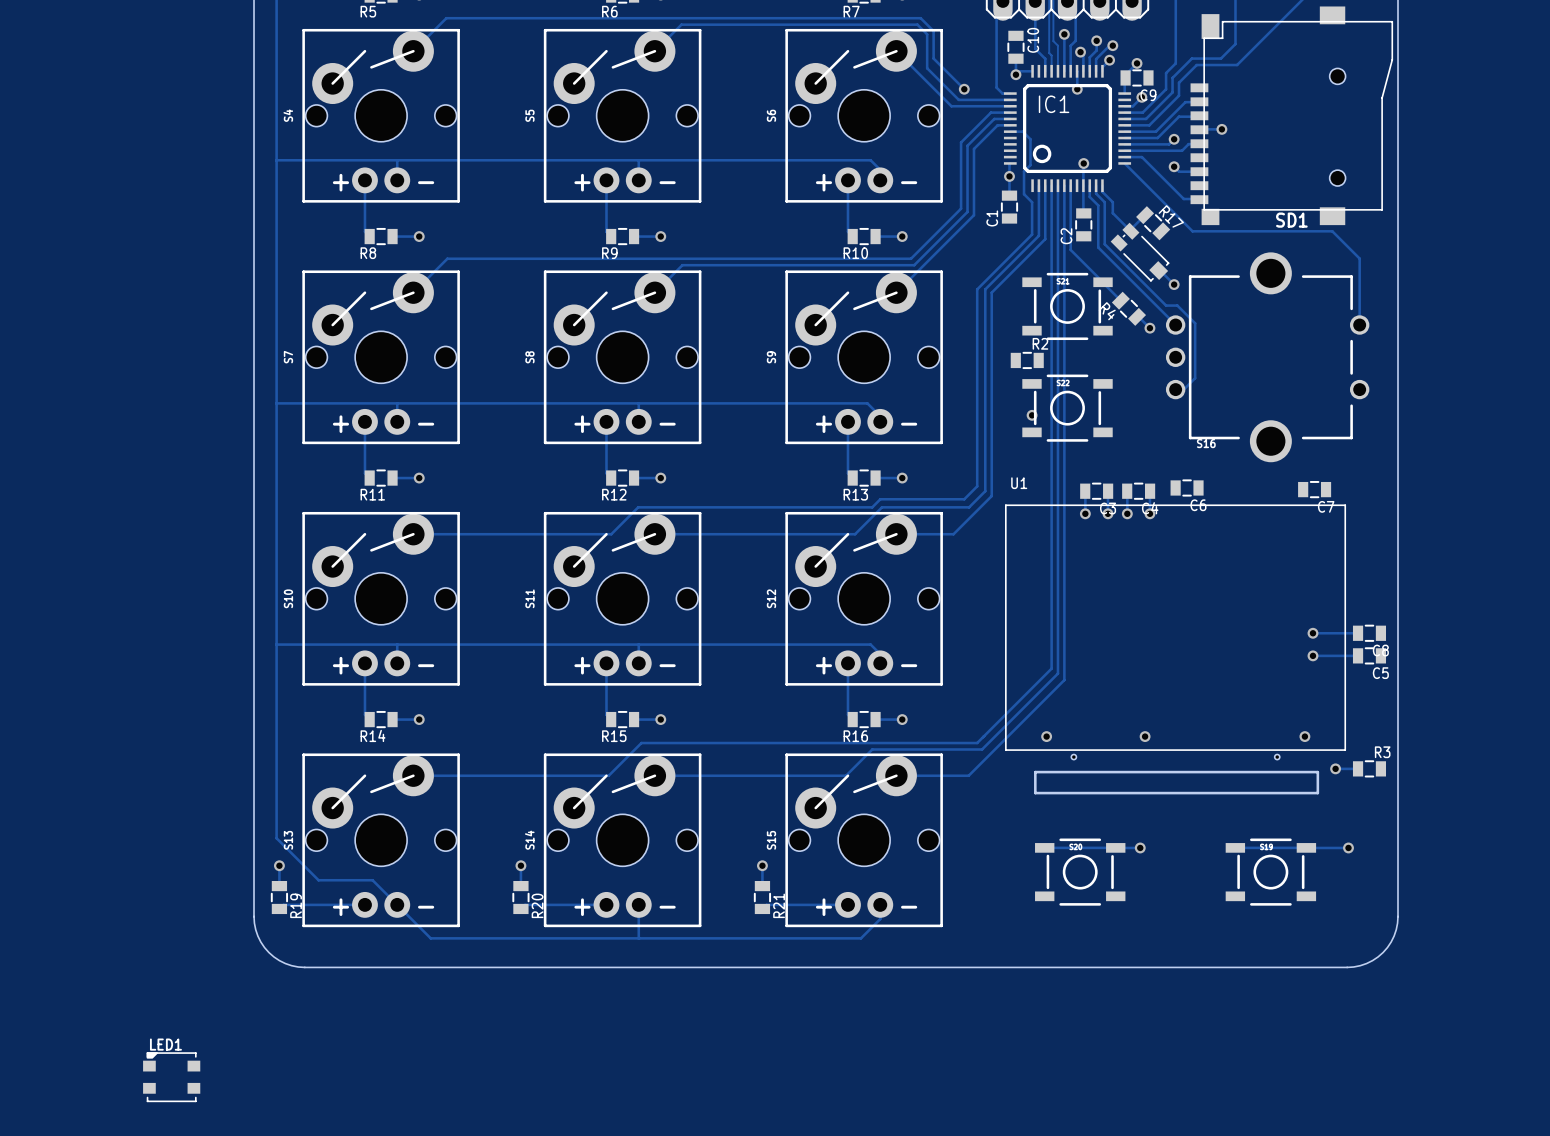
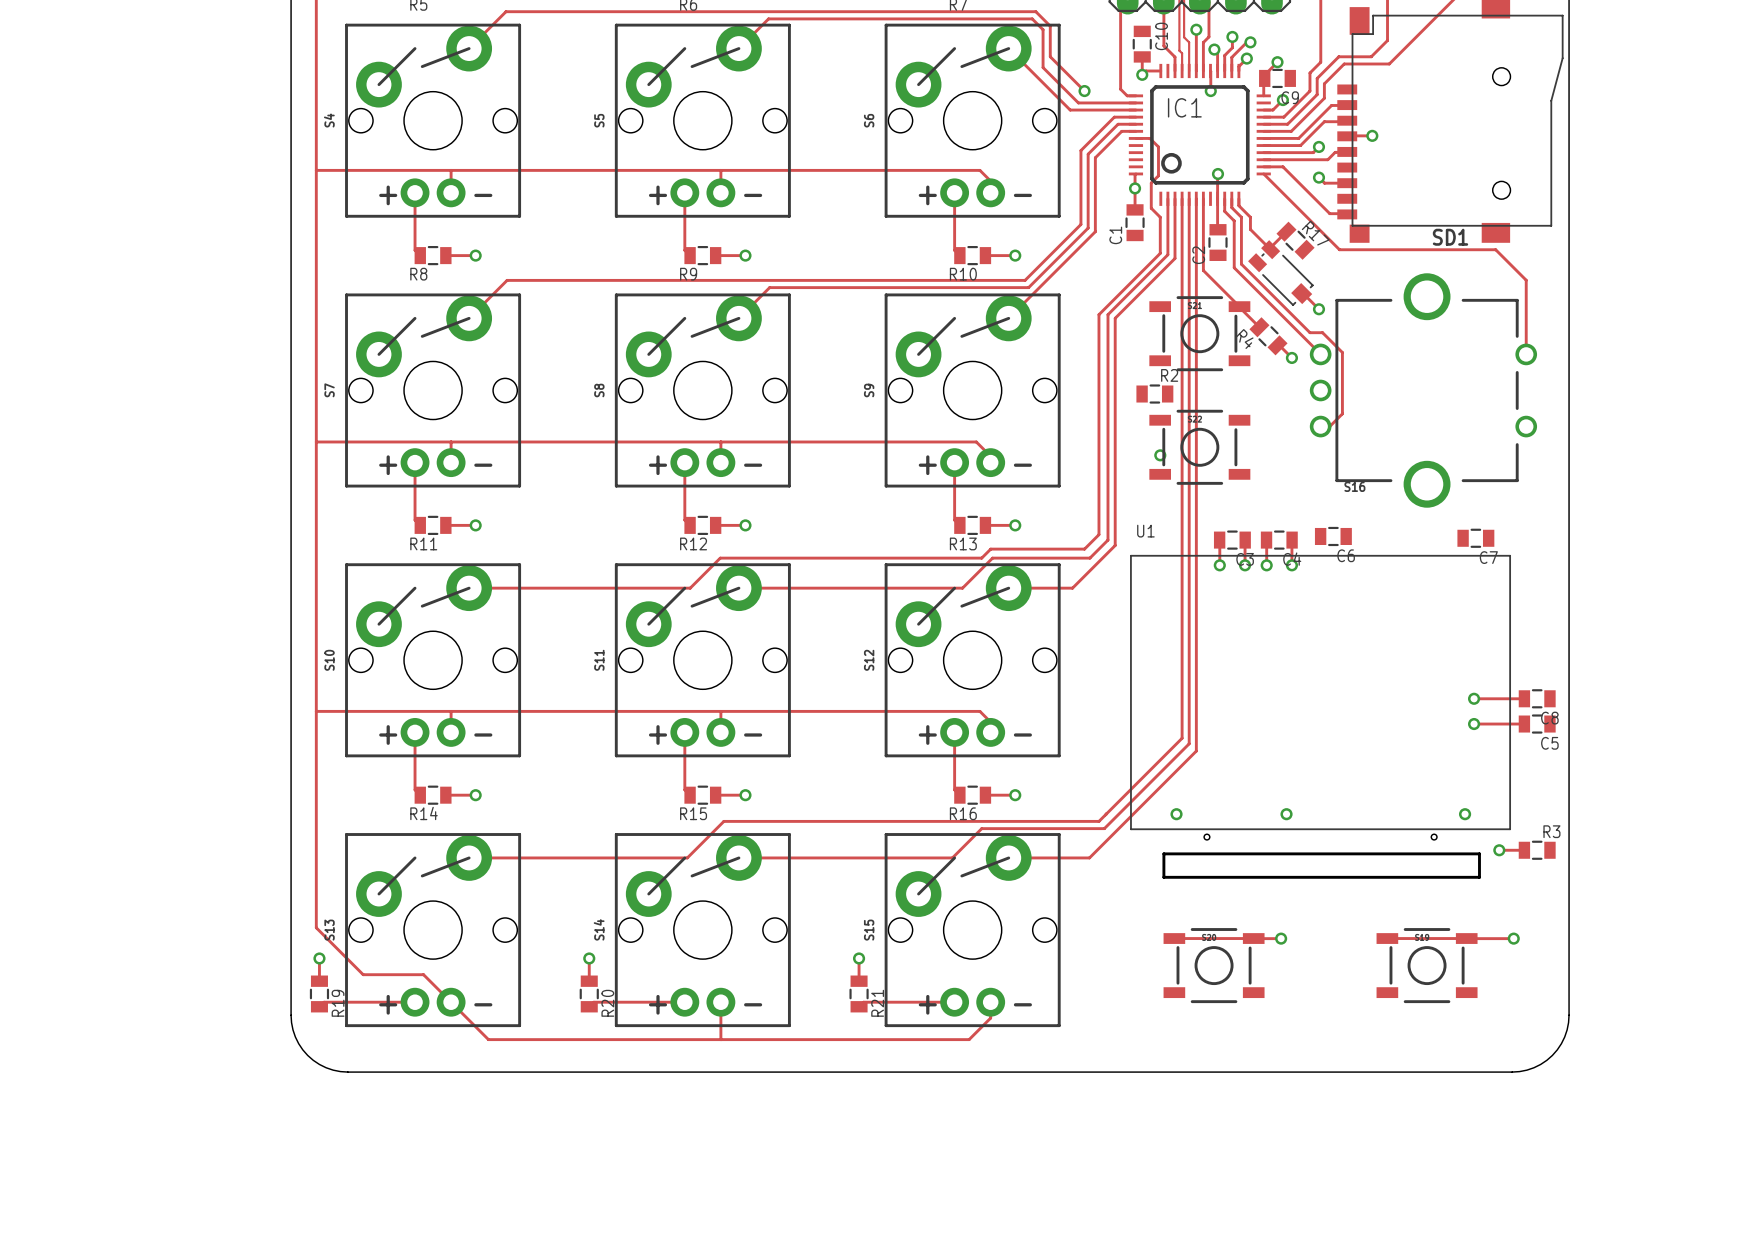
LED1: (171, 1077) -> none

